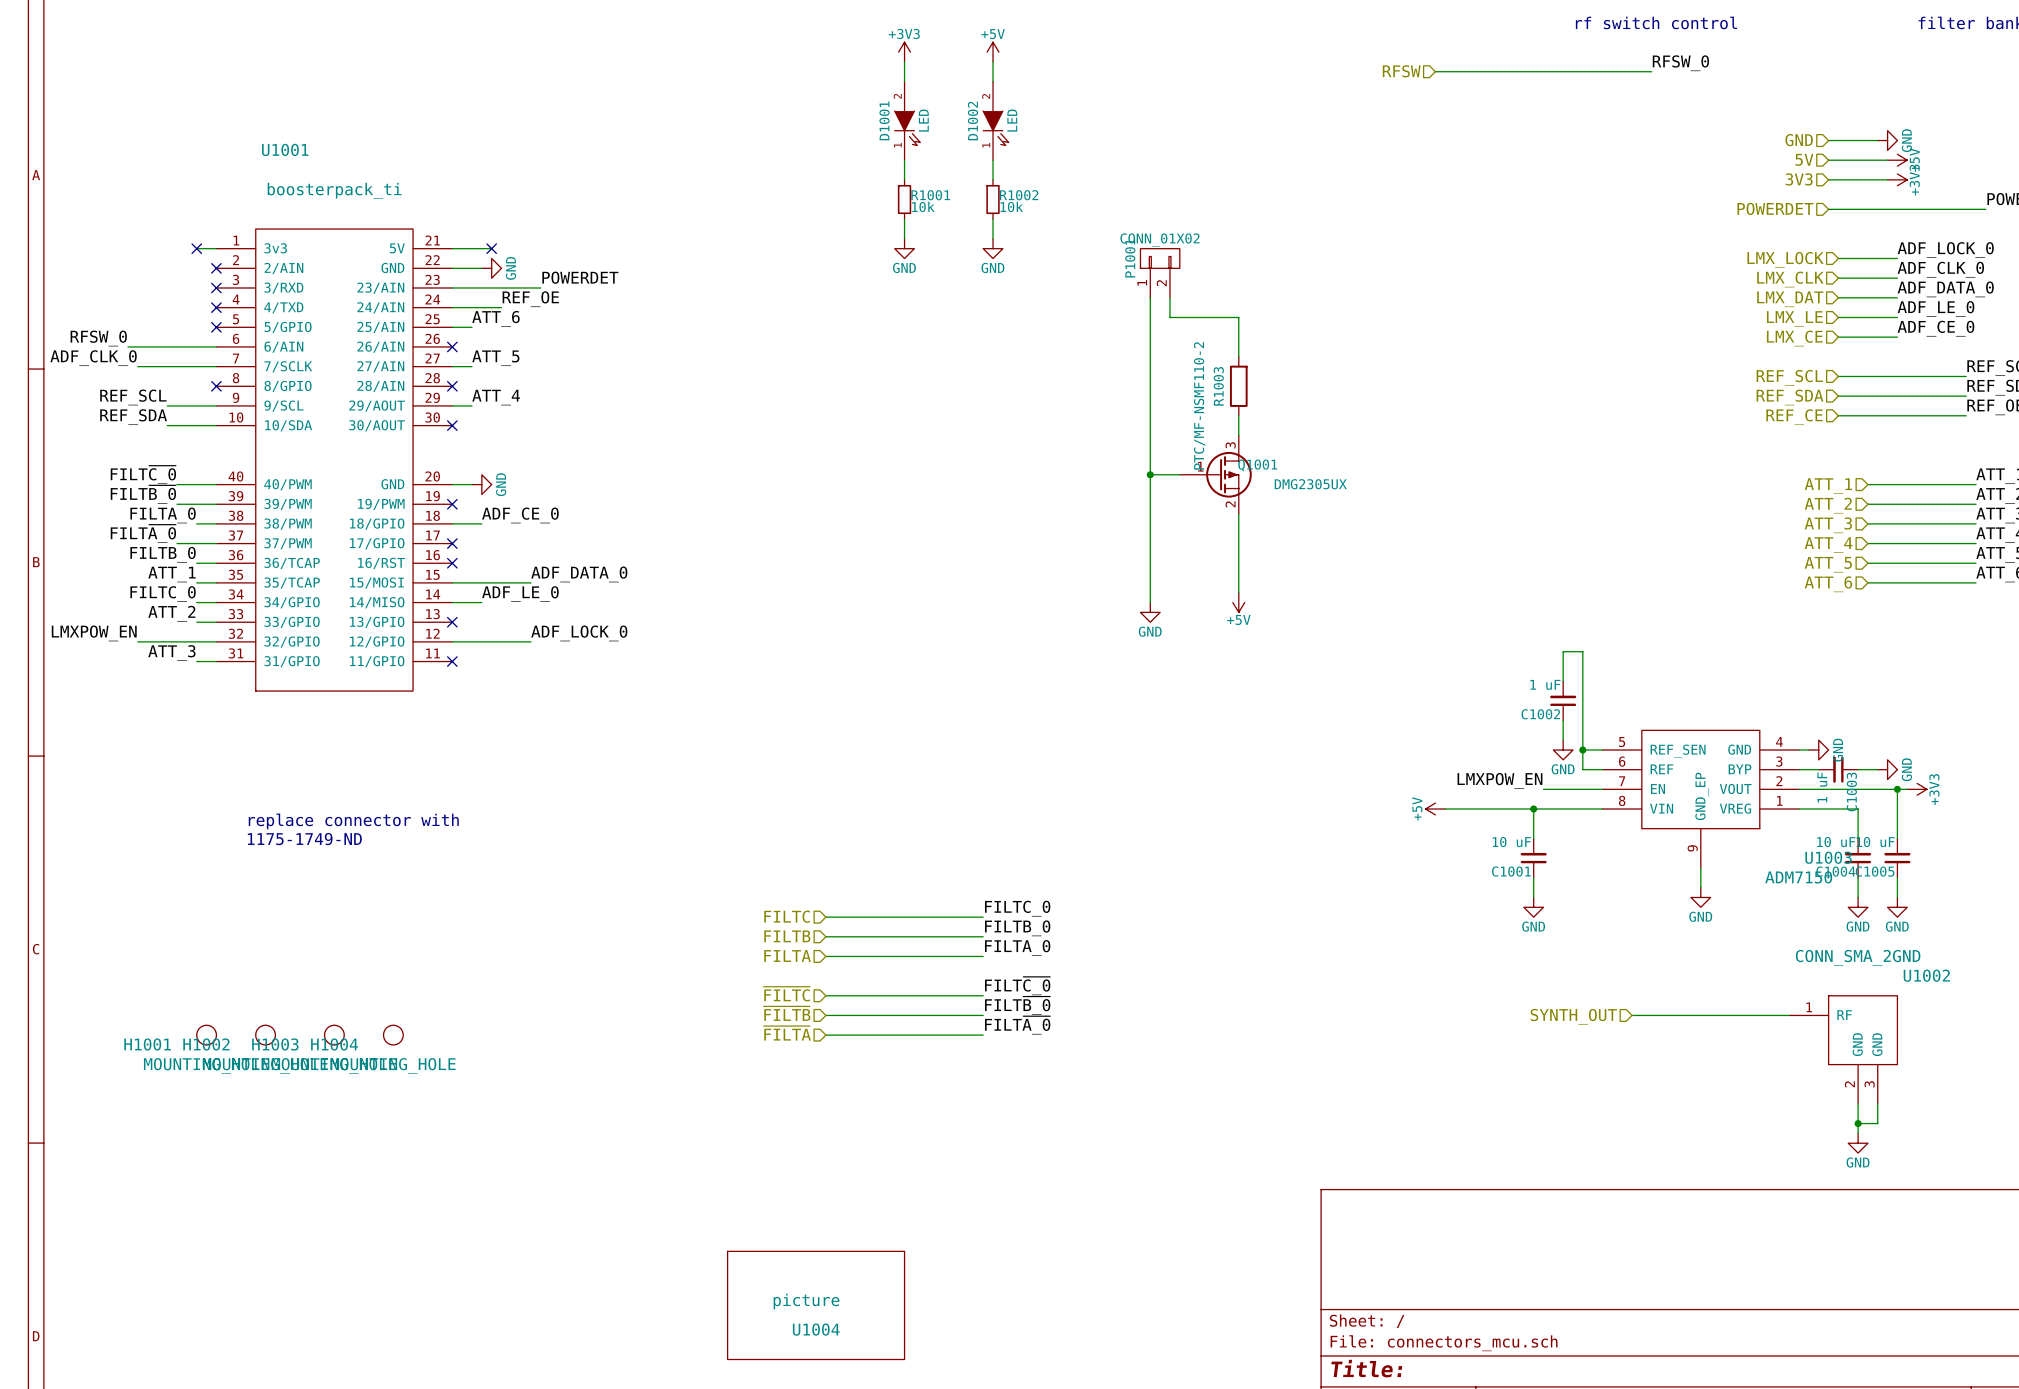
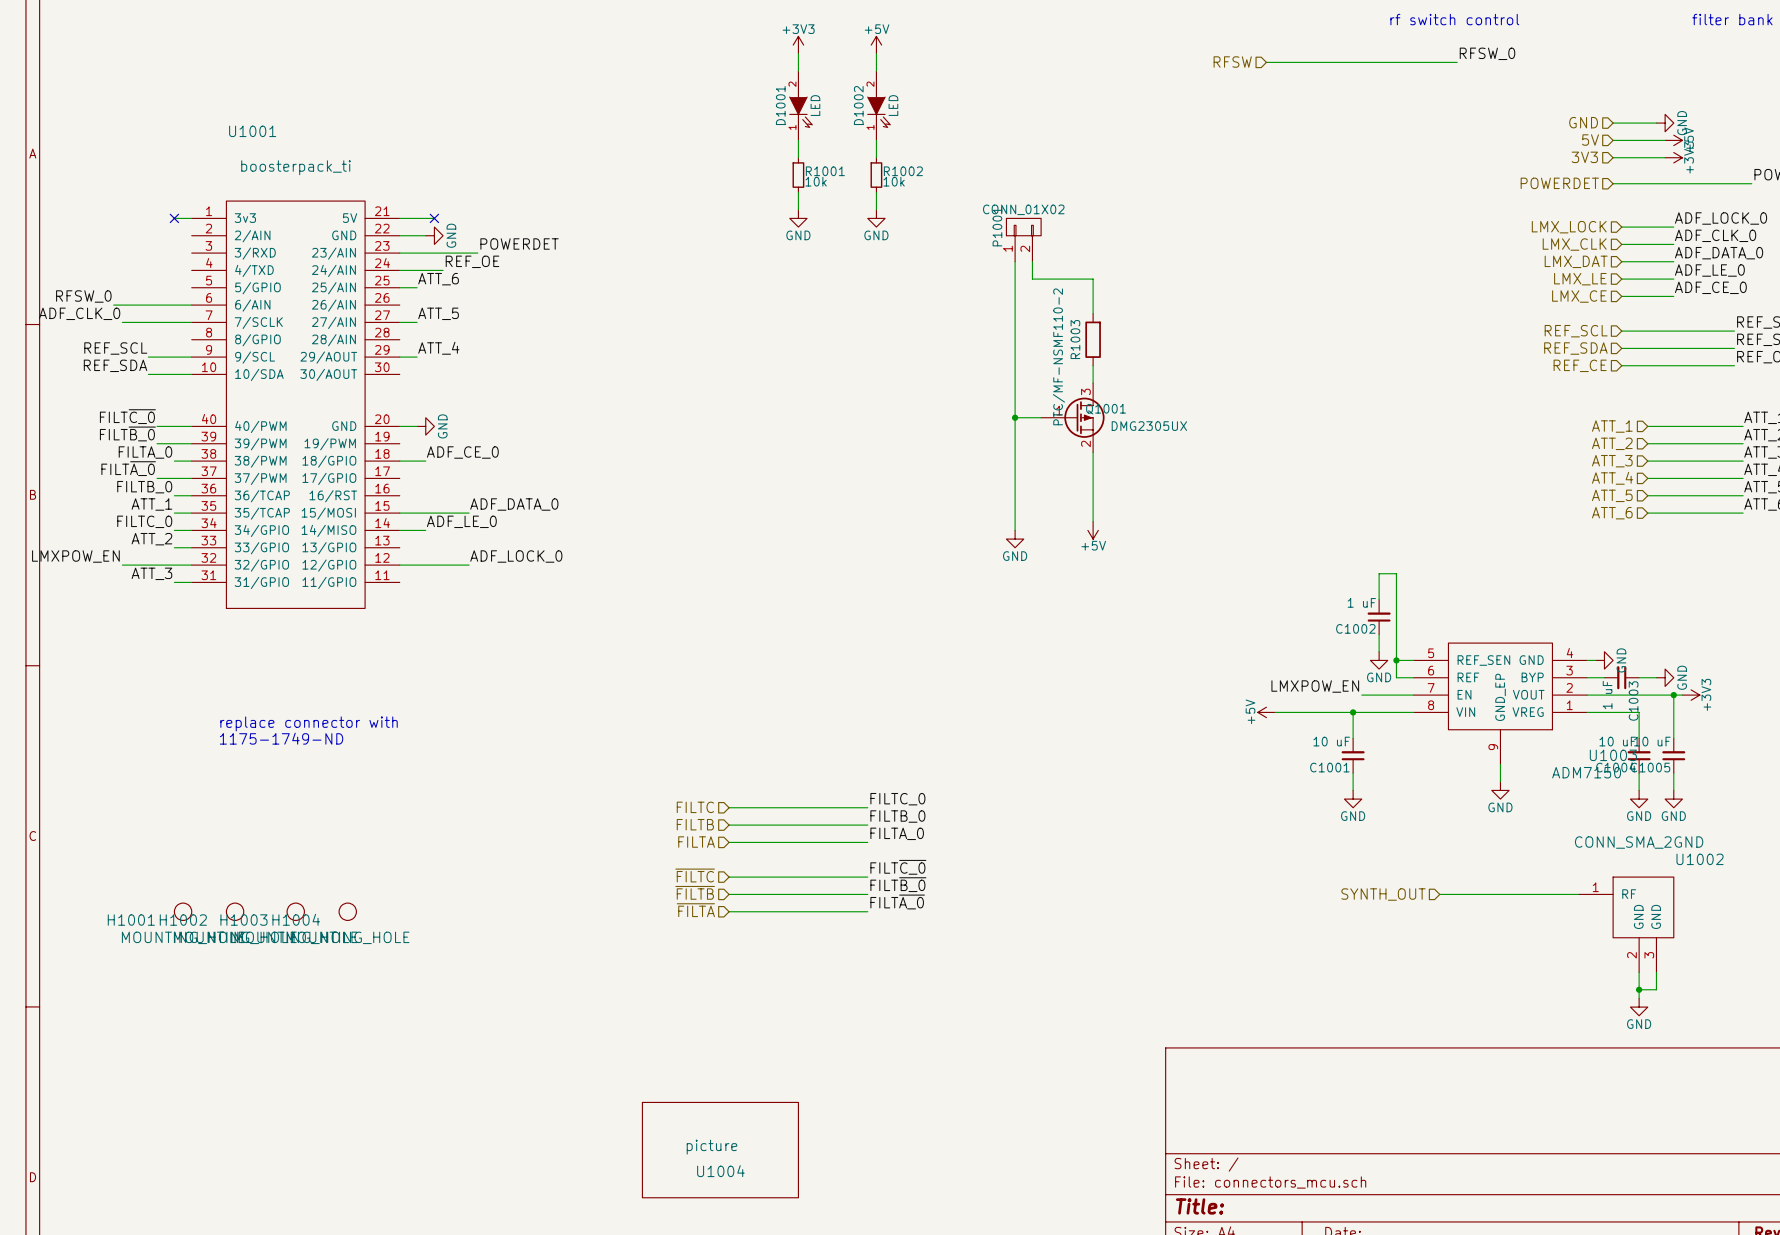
no-connect mark: (216, 268) -> none
no-connect mark: (216, 287) -> none
no-connect mark: (216, 307) -> none
no-connect mark: (216, 327) -> none
no-connect mark: (452, 346) -> none
no-connect mark: (216, 386) -> none
no-connect mark: (452, 386) -> none
no-connect mark: (452, 425) -> none
no-connect mark: (452, 504) -> none
no-connect mark: (452, 543) -> none
no-connect mark: (452, 563) -> none
no-connect mark: (452, 622) -> none
no-connect mark: (452, 661) -> none

